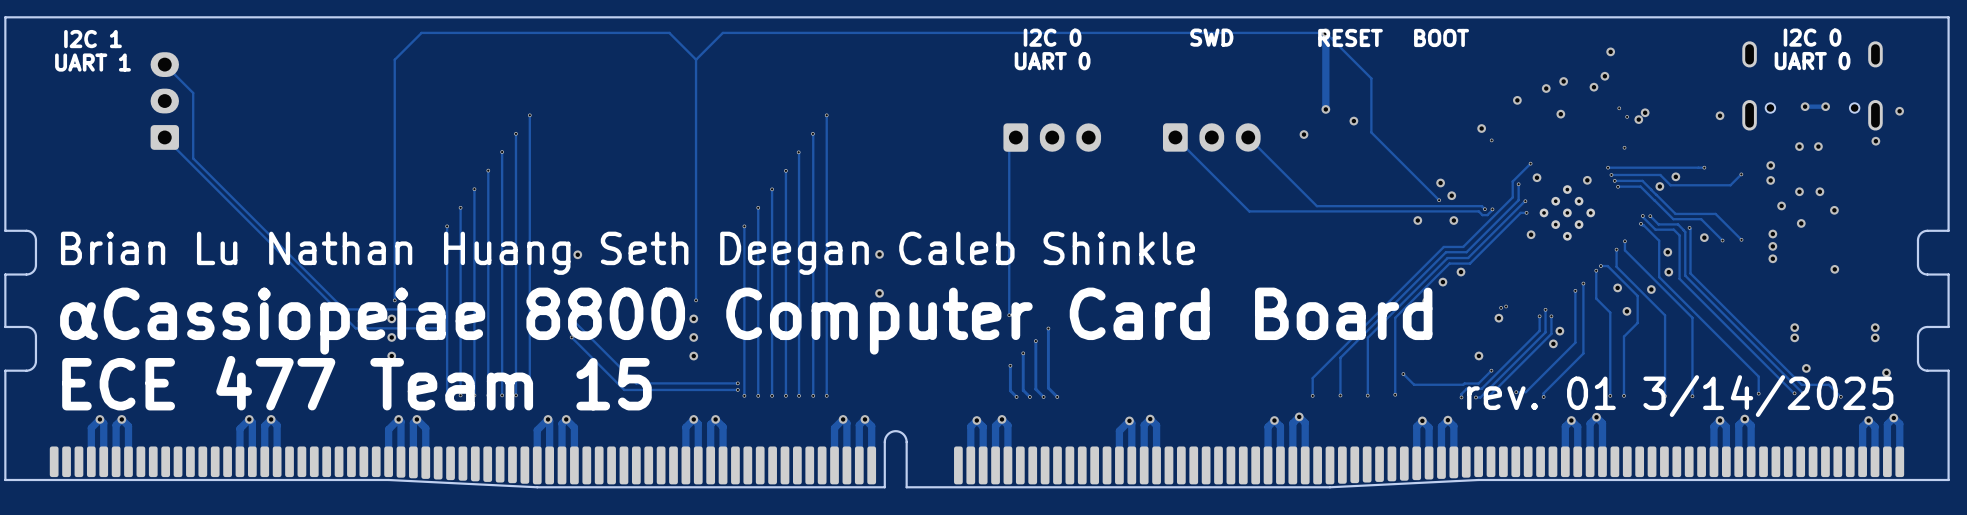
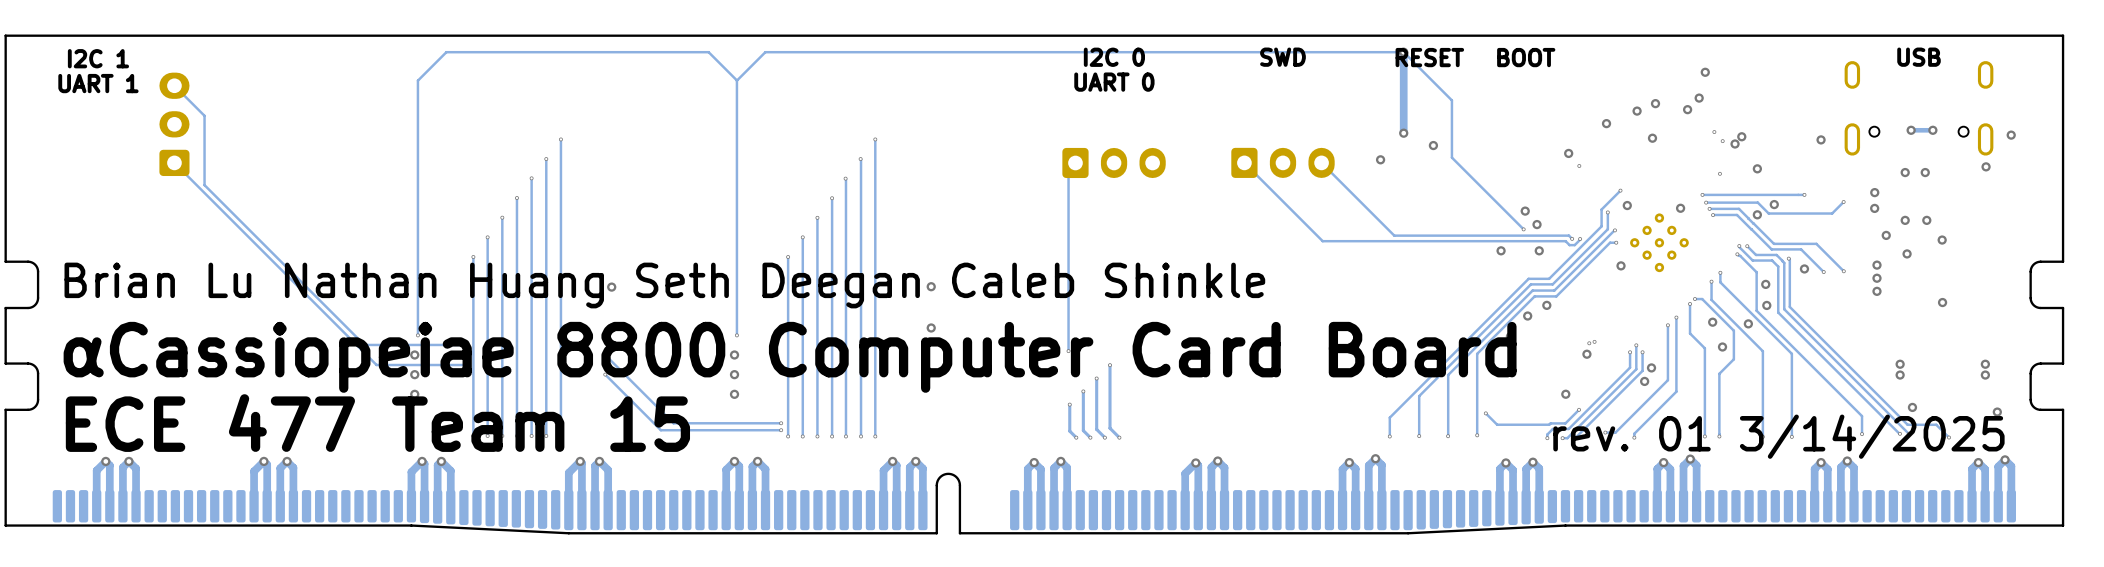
text: I2C 0 (1812, 37) -> USB (1919, 57)
text: UART 0 (1812, 61) -> none
via: none -> (1757, 168)

